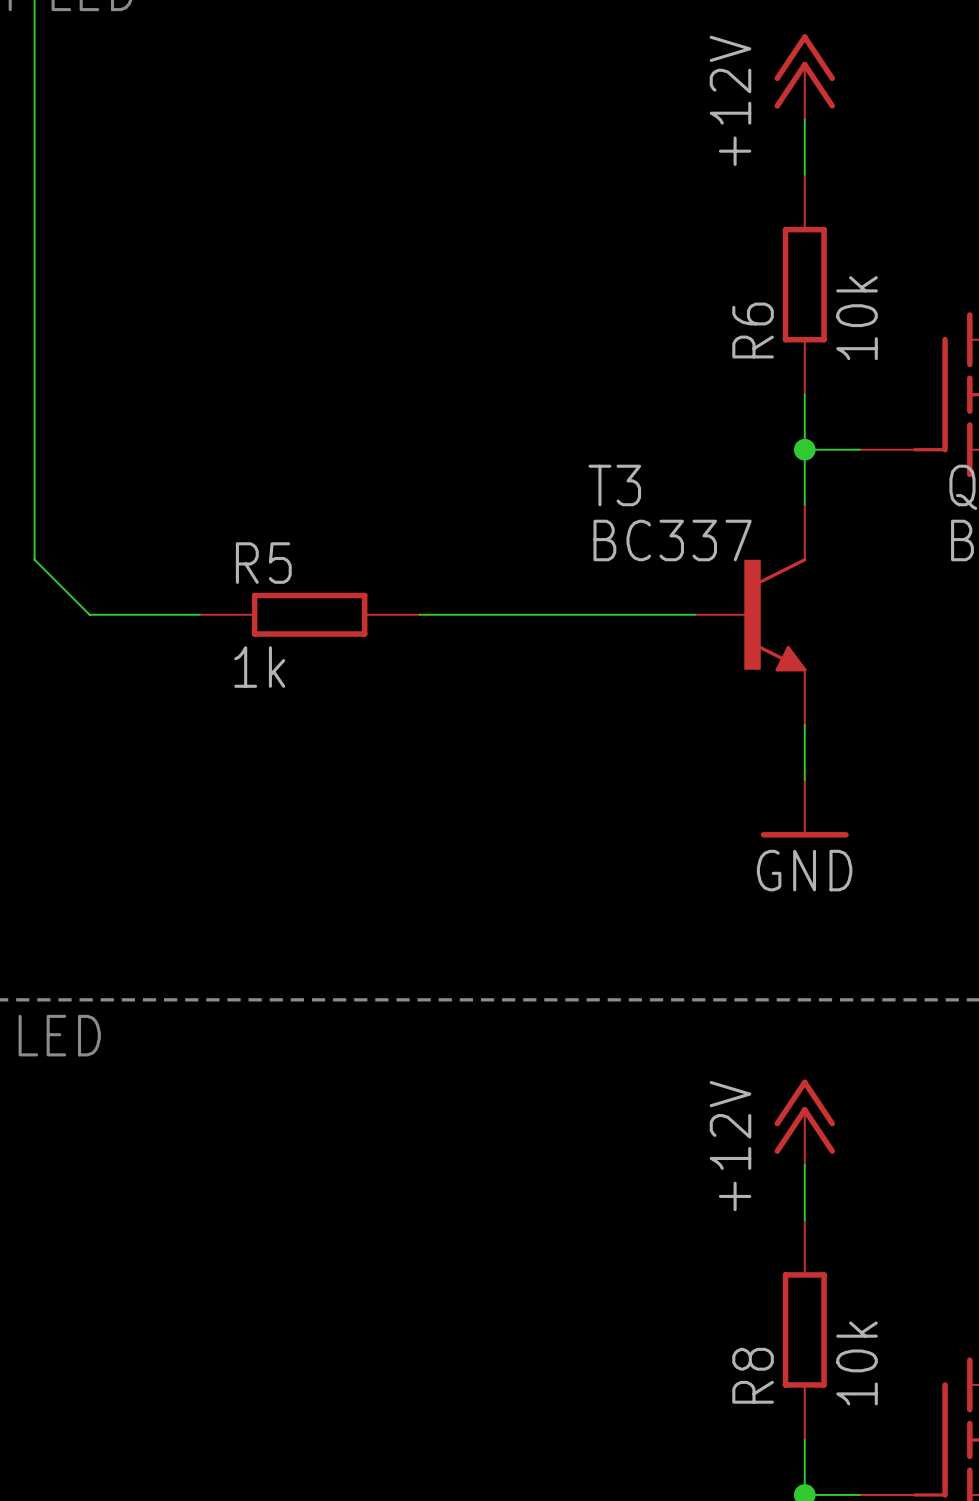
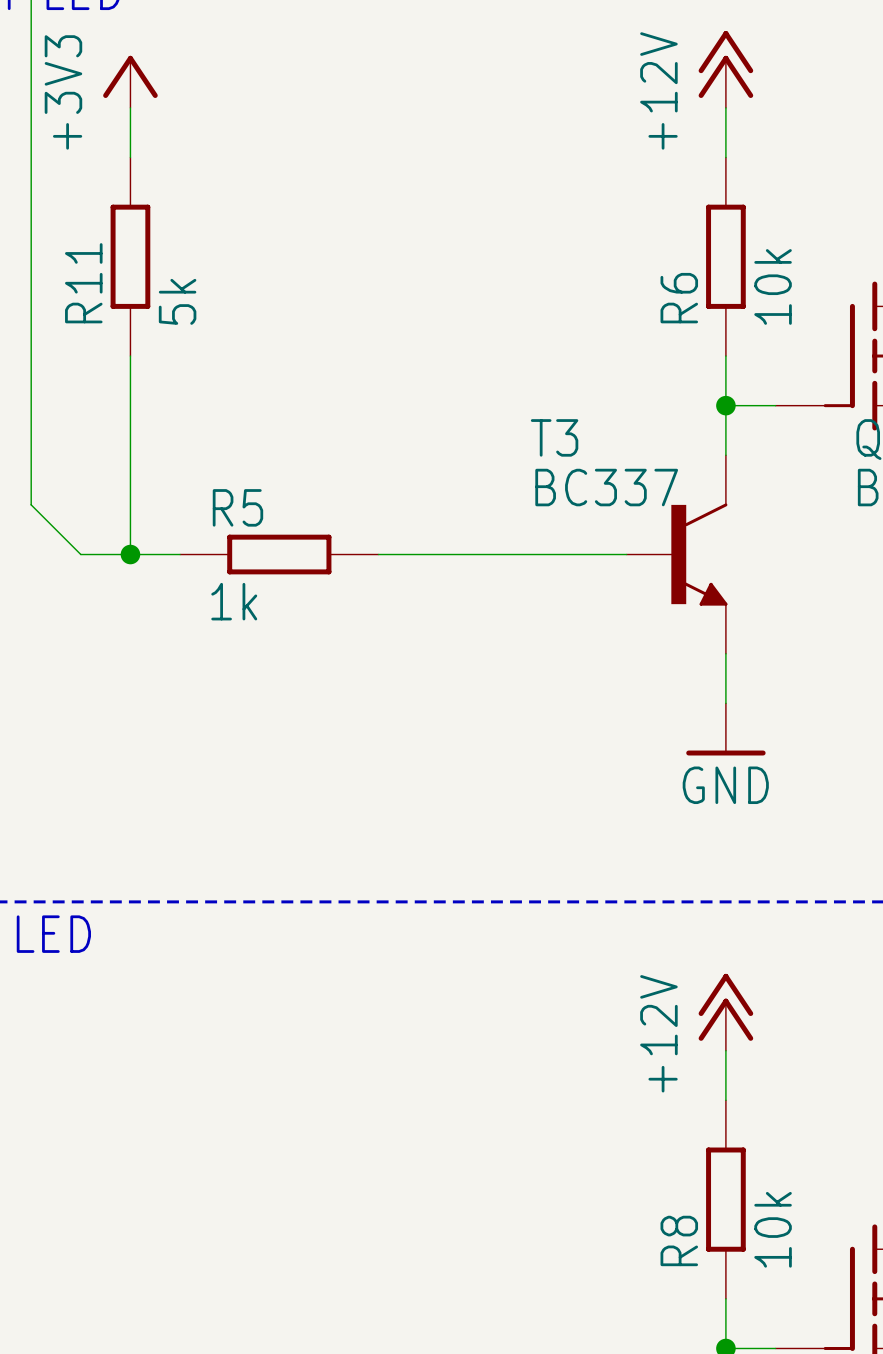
power symbol: none -> +3V3 (130, 81)
wire: none -> (130, 107) (130, 157)
R11: none -> 5k (130, 256)
wire: none -> (130, 356) (130, 554)
junction: none -> (130, 554)

